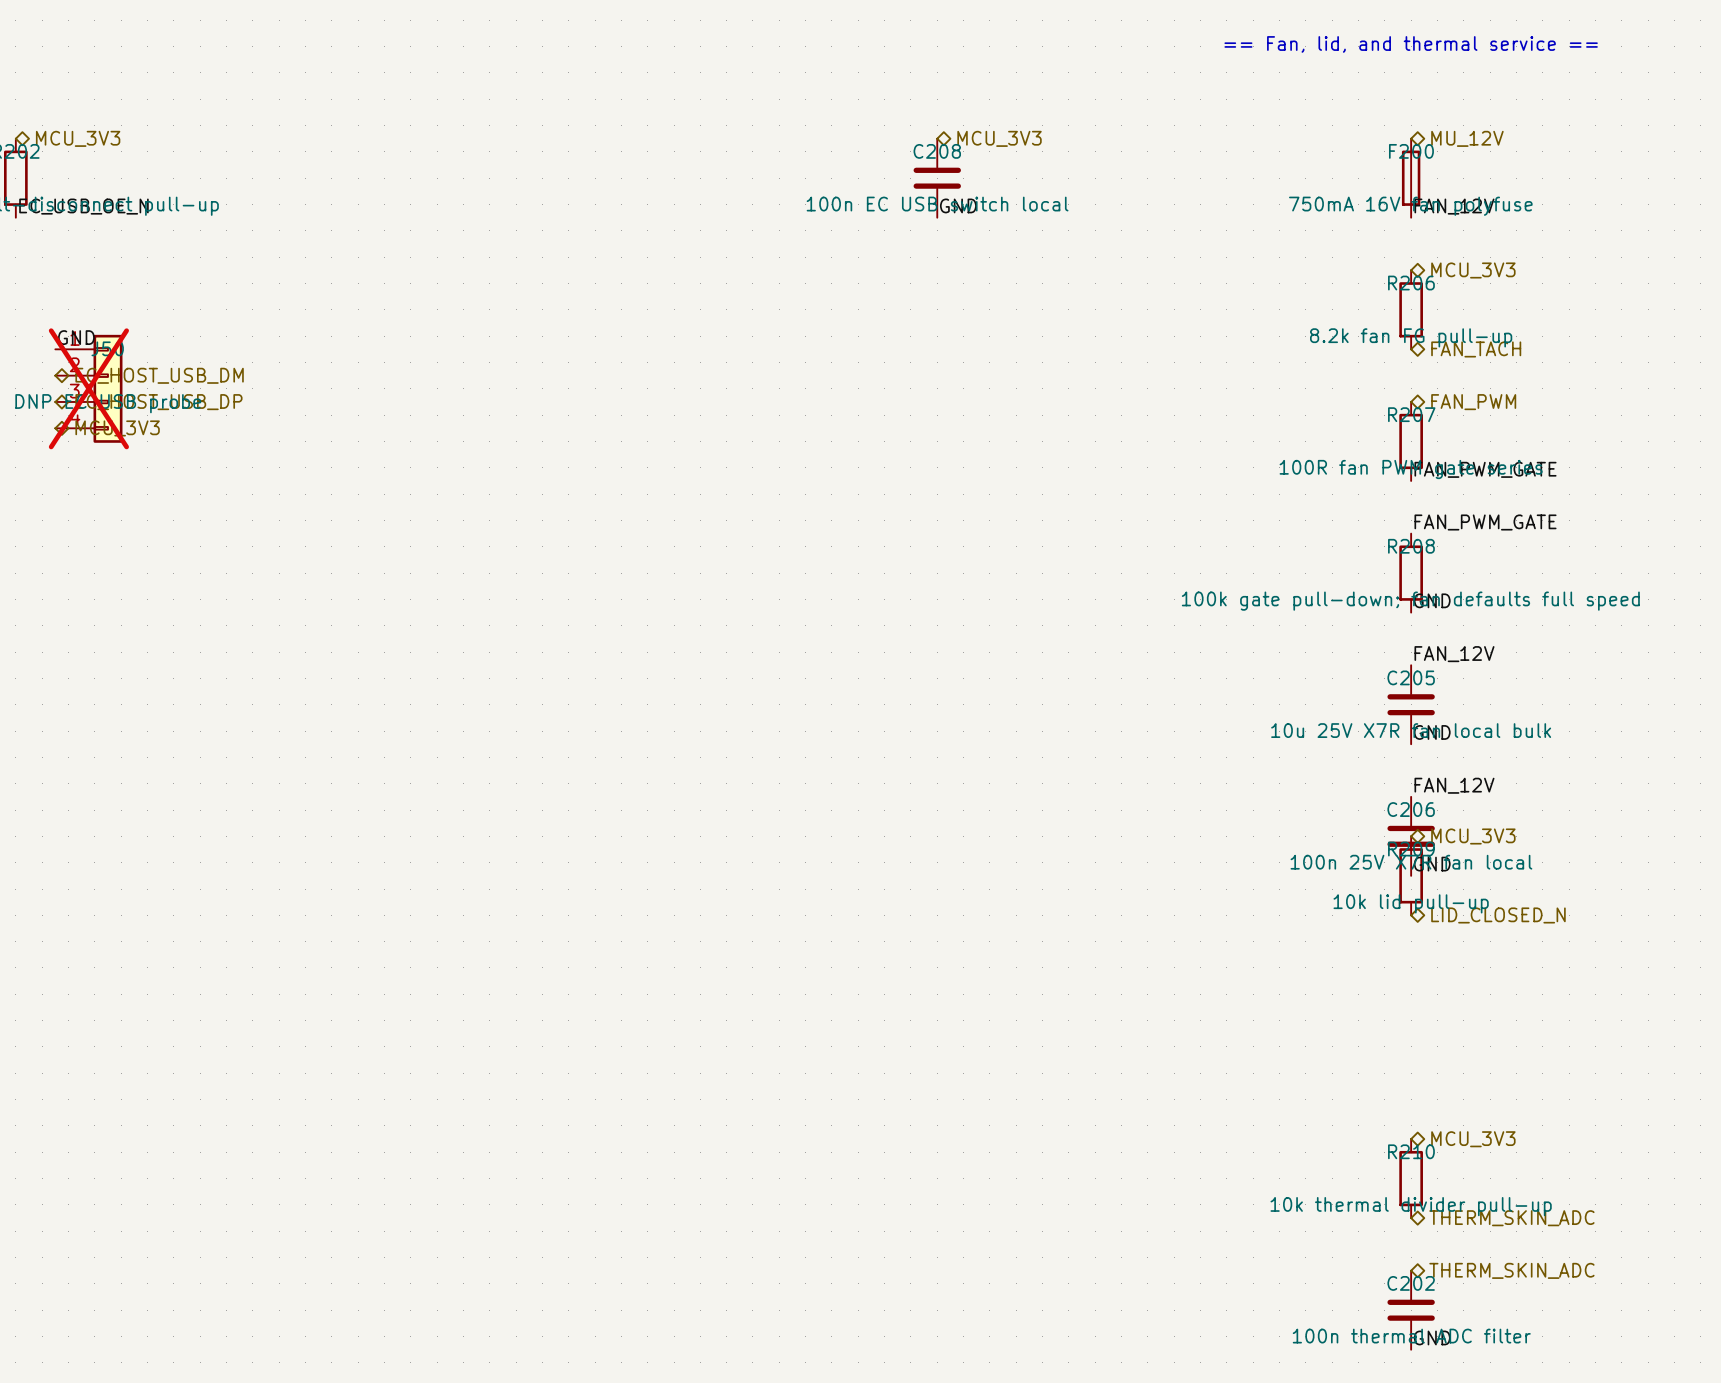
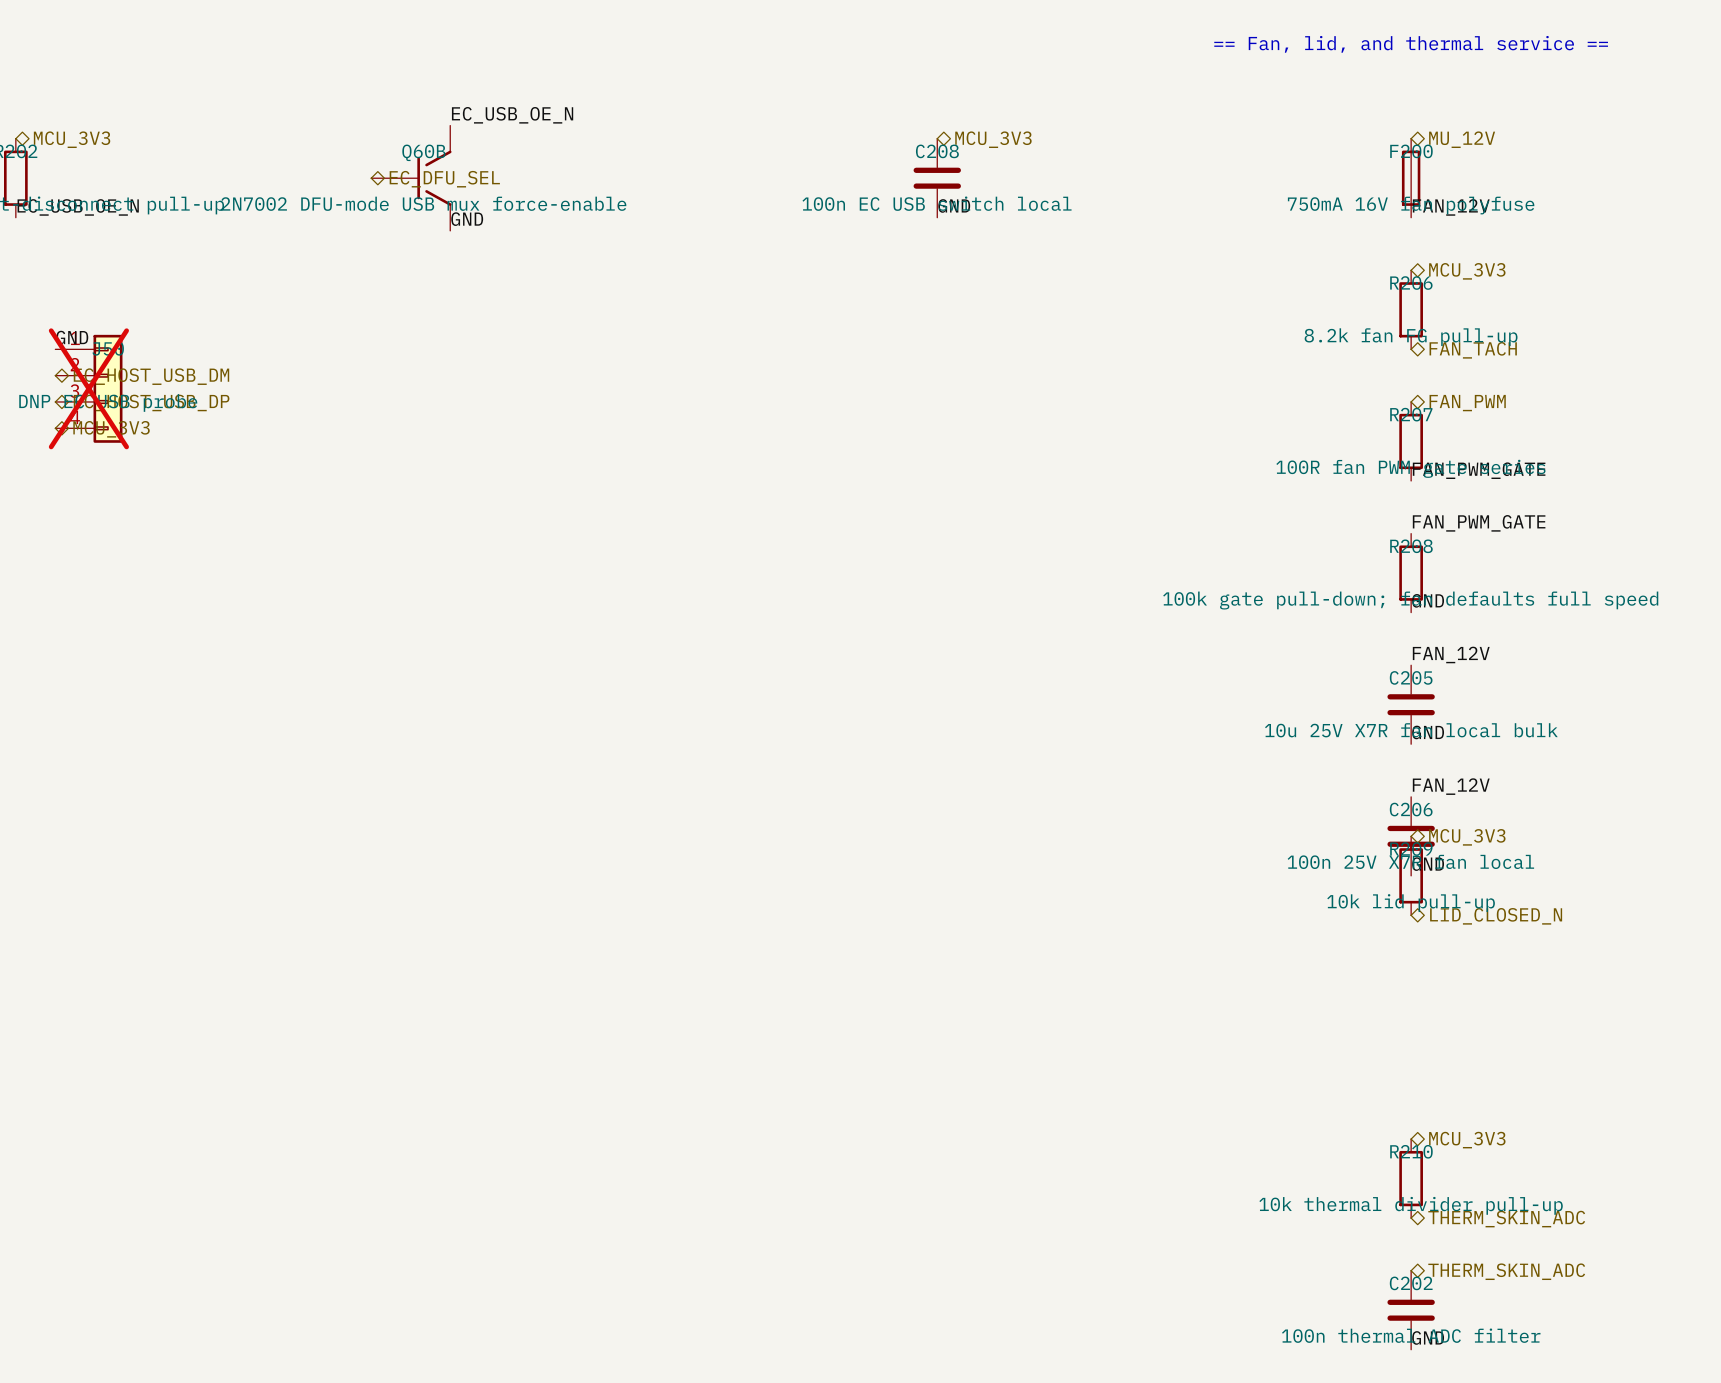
label: none -> EC_USB_OE_N (512, 115)
Q60B: none -> 2N7002 DFU-mode USB mux force-enable (411, 178)
hierarchical label: none -> EC_DFU_SEL (444, 179)
label: none -> GND (467, 219)

